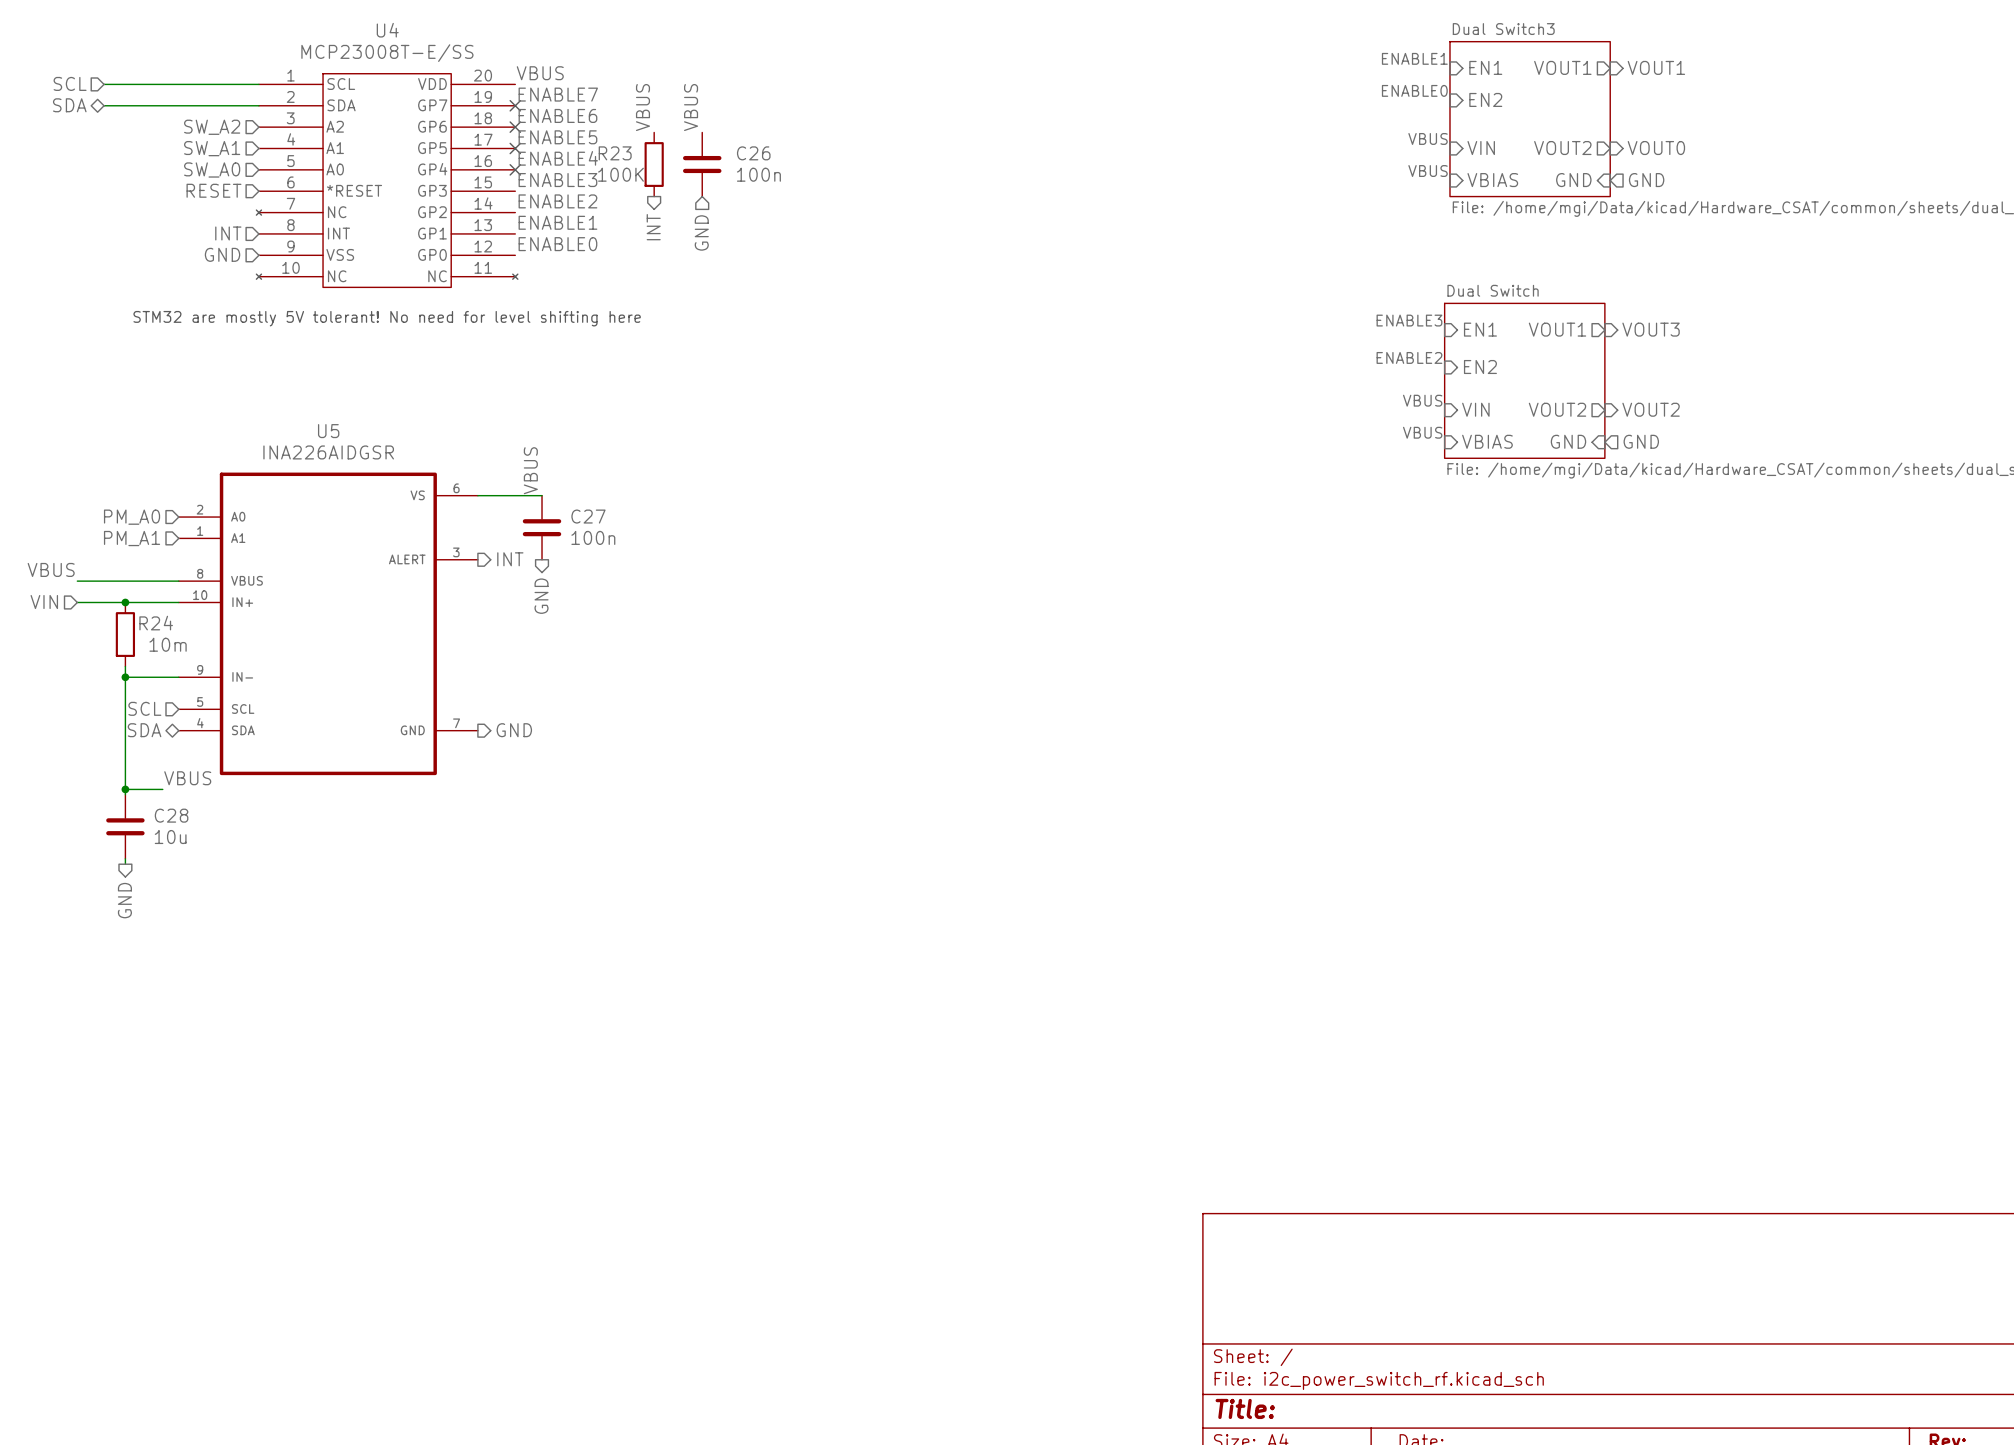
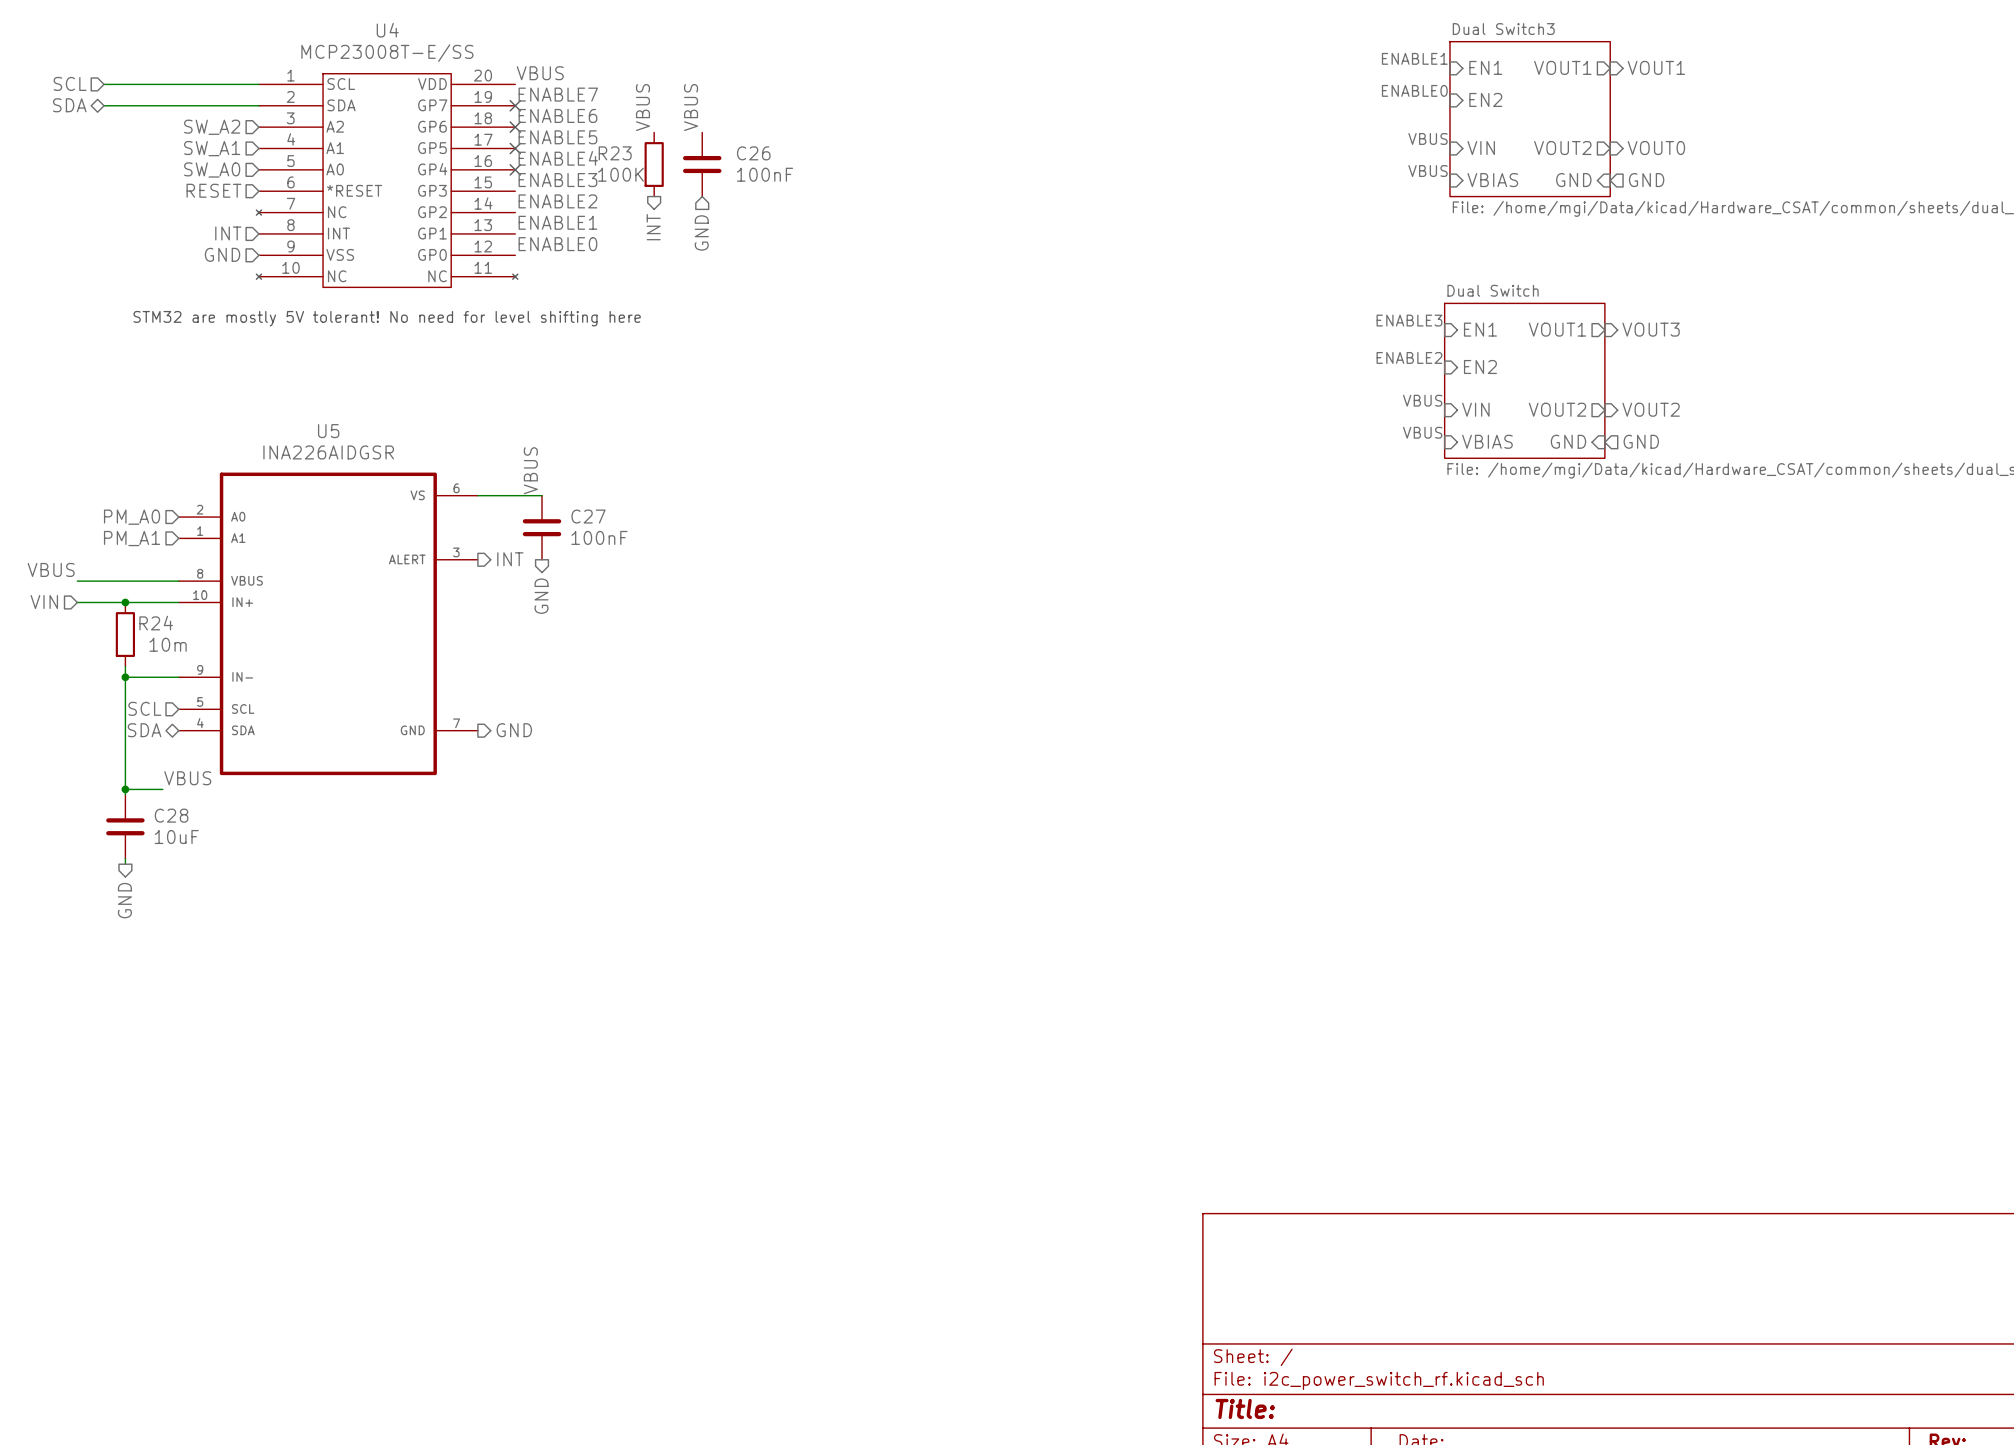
C26 value: 100n (758, 174) -> 100nF (765, 174)
C27 value: 100n (593, 537) -> 100nF (599, 537)
C28 value: 10u (170, 837) -> 10uF (176, 837)

